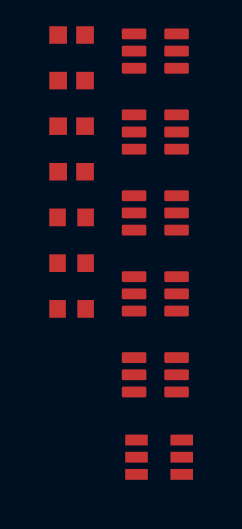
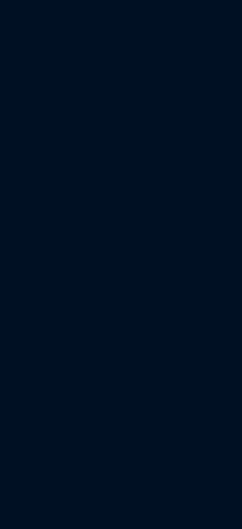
part: (71, 35) -> none
part: (155, 51) -> none
part: (71, 80) -> none
part: (71, 126) -> none
part: (155, 131) -> none
part: (71, 171) -> none
part: (155, 212) -> none
part: (71, 217) -> none
part: (71, 263) -> none
part: (155, 293) -> none
part: (71, 308) -> none
part: (155, 374) -> none
part: (159, 457) -> none

